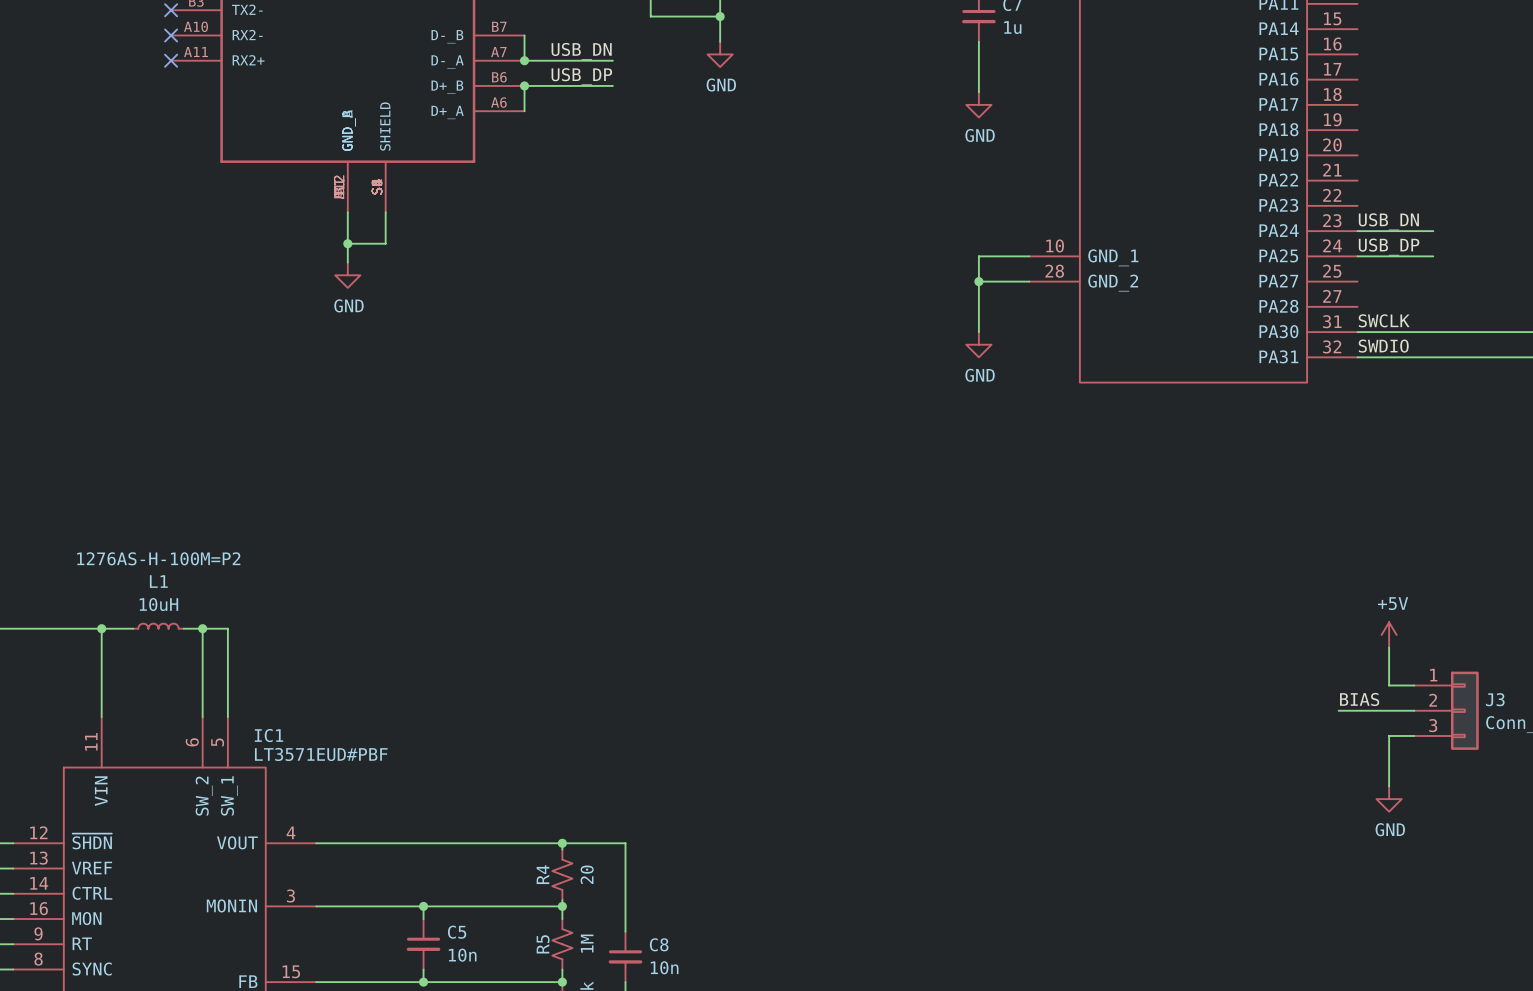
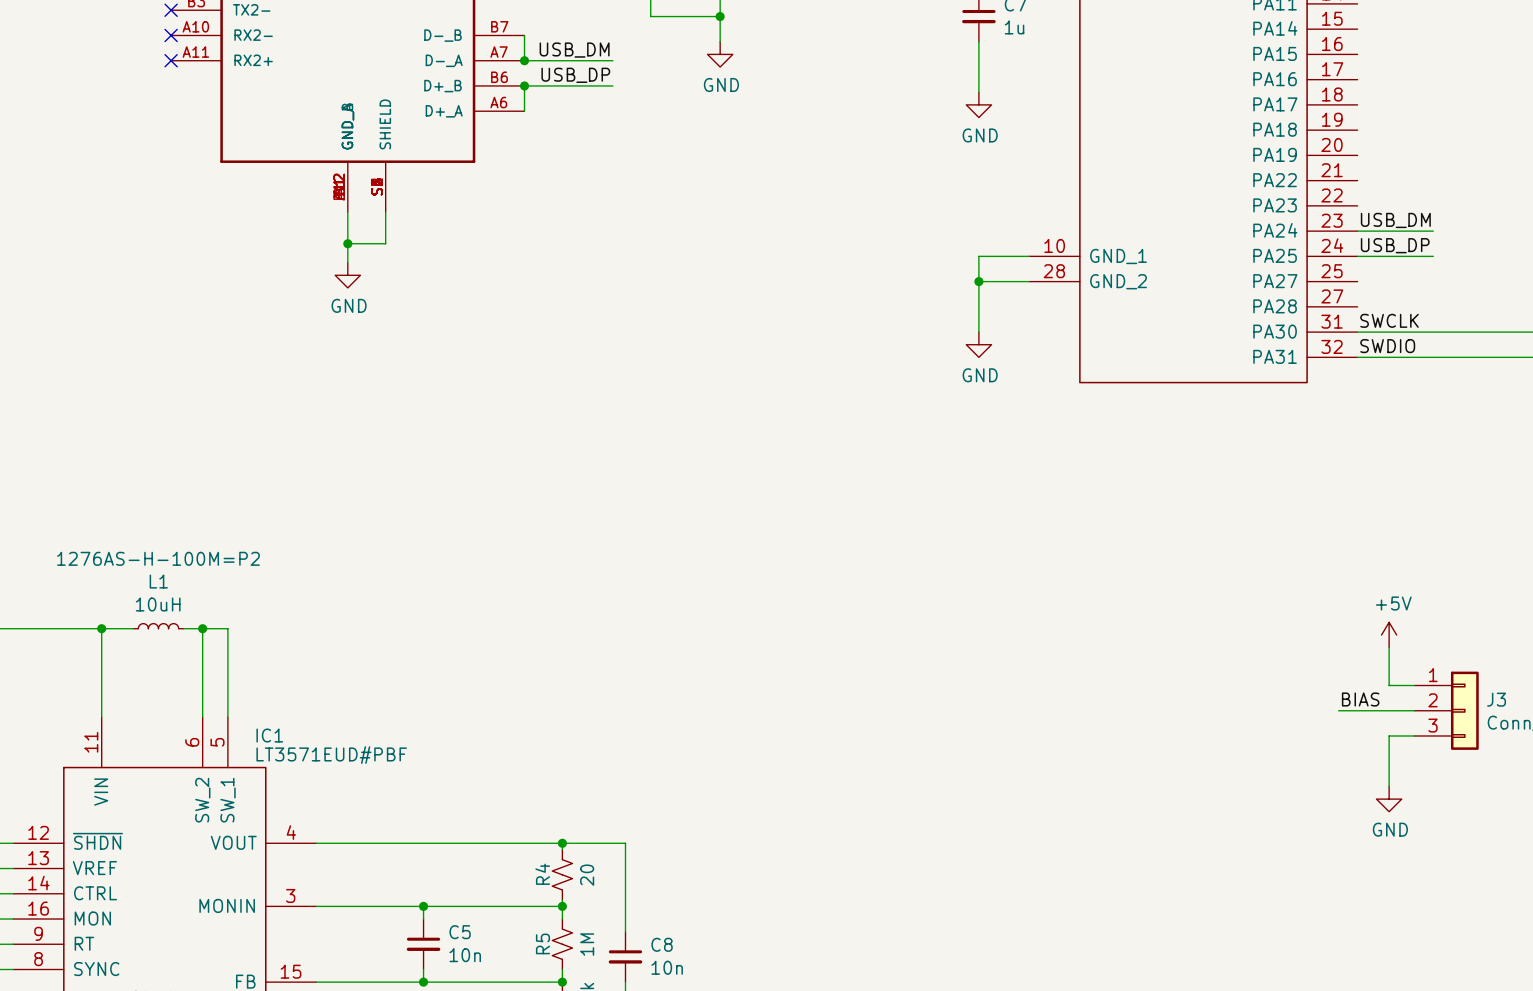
label: USB_DN (581, 51) -> USB_DM (574, 50)
label: USB_DN (1388, 221) -> USB_DM (1395, 220)

